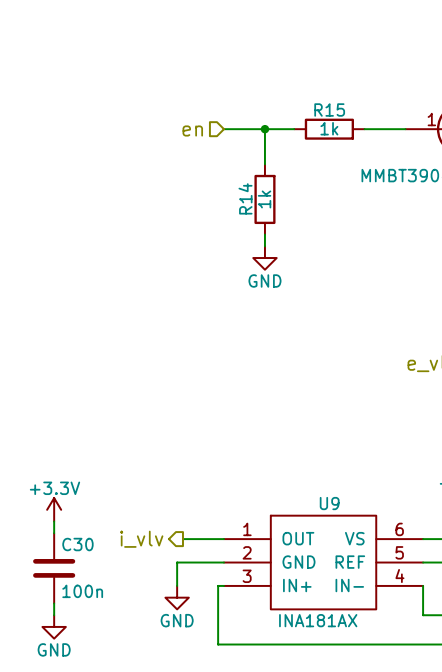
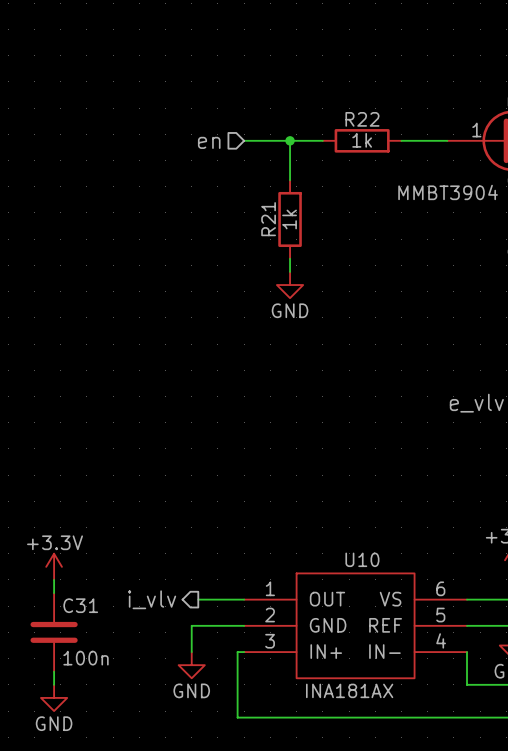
R15 name: R15 (329, 110) -> R22 (362, 119)
R14 name: R14 (245, 198) -> R21 (268, 219)
U9 name: U9 (329, 503) -> U10 (362, 559)
C30 name: C30 (77, 544) -> C31 (80, 605)

